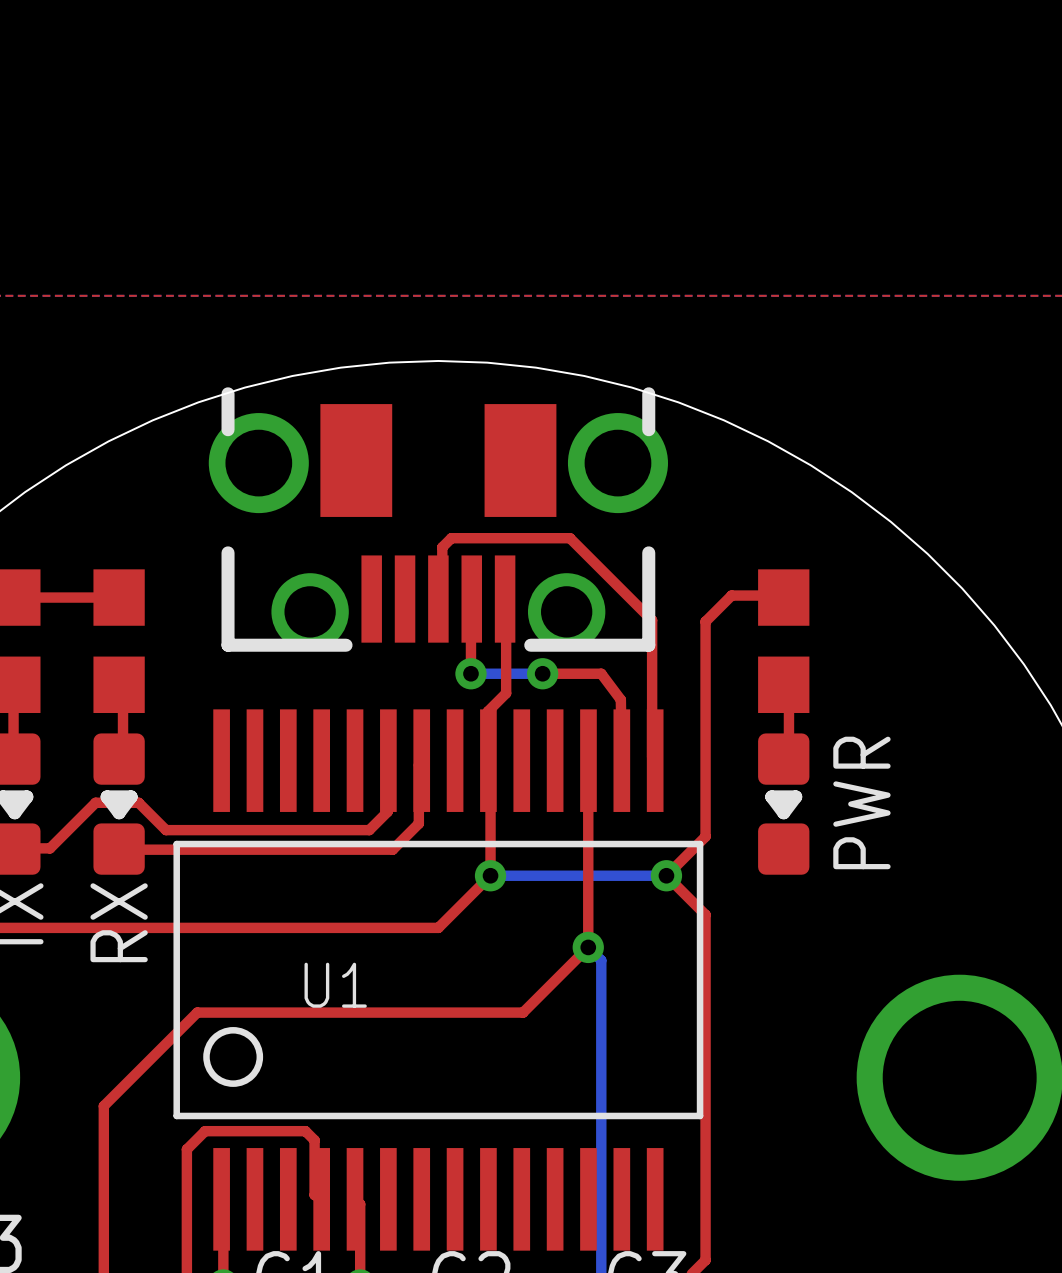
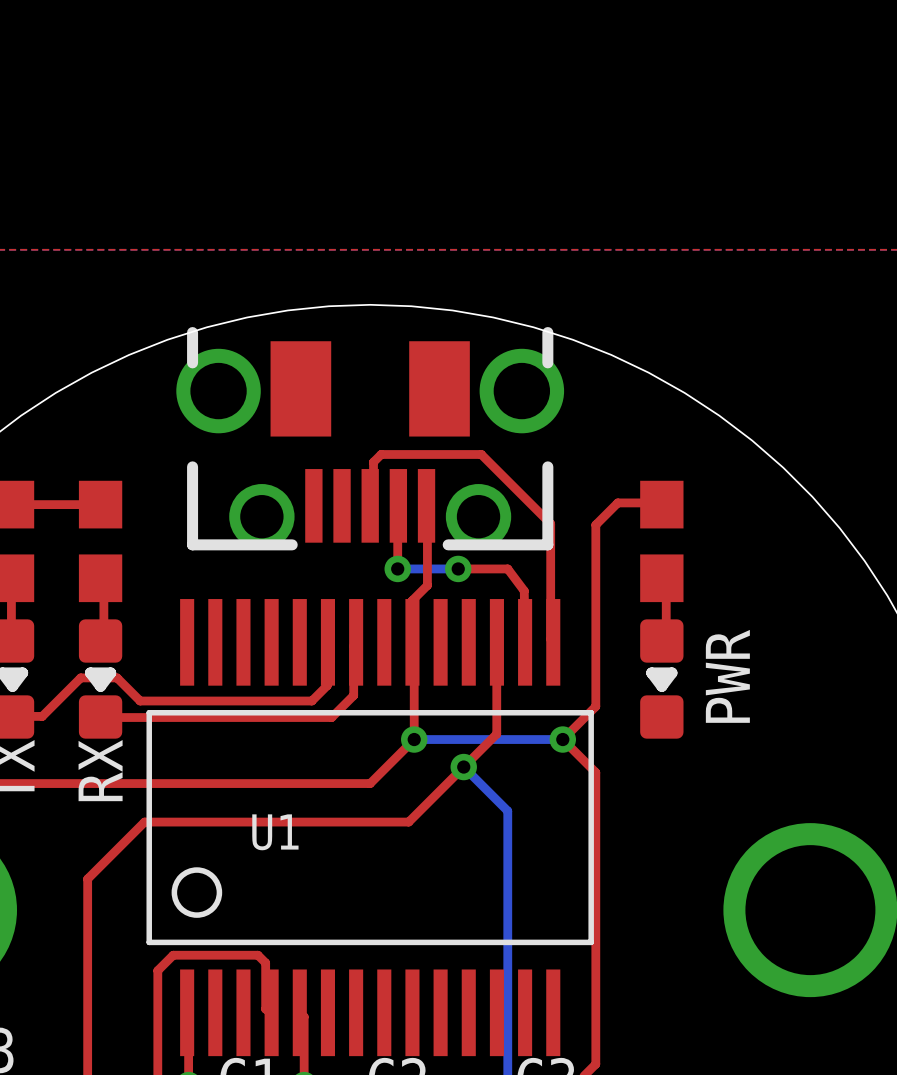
top track: (588, 869) (588, 947) (523, 1012) (197, 1012) (103, 1106) -> (496, 734) (408, 822) (144, 822) (87, 879) (87, 934)
bottom track: none -> (463, 767) (496, 800)
via position: (588, 947) -> (463, 767)

